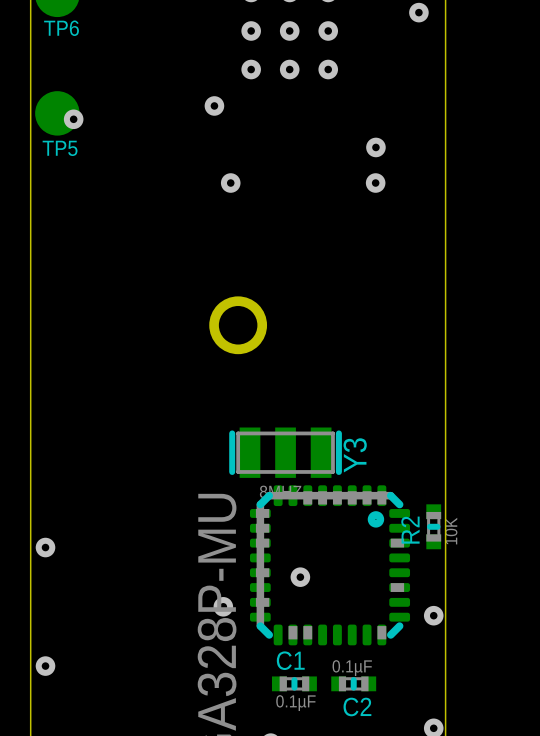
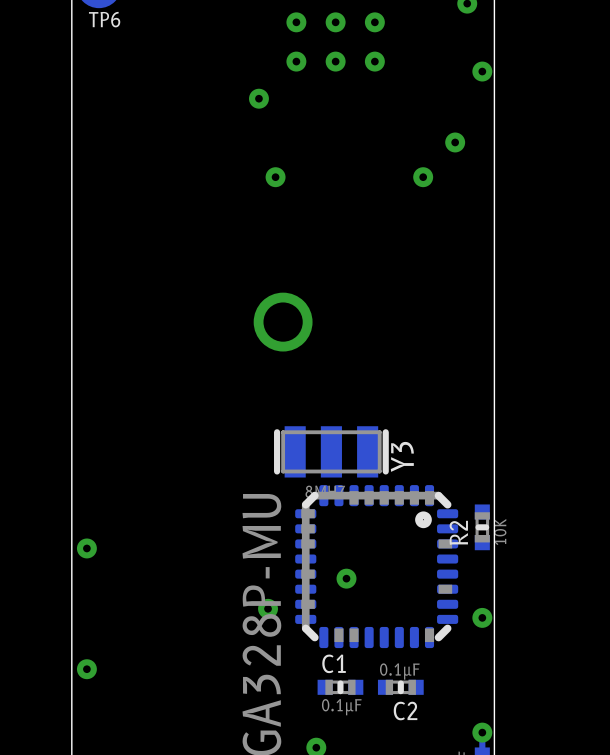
via: none -> (482, 71)
TP5: (57, 113) -> none
via: (73, 119) -> none
via position: (375, 147) -> (455, 142)

